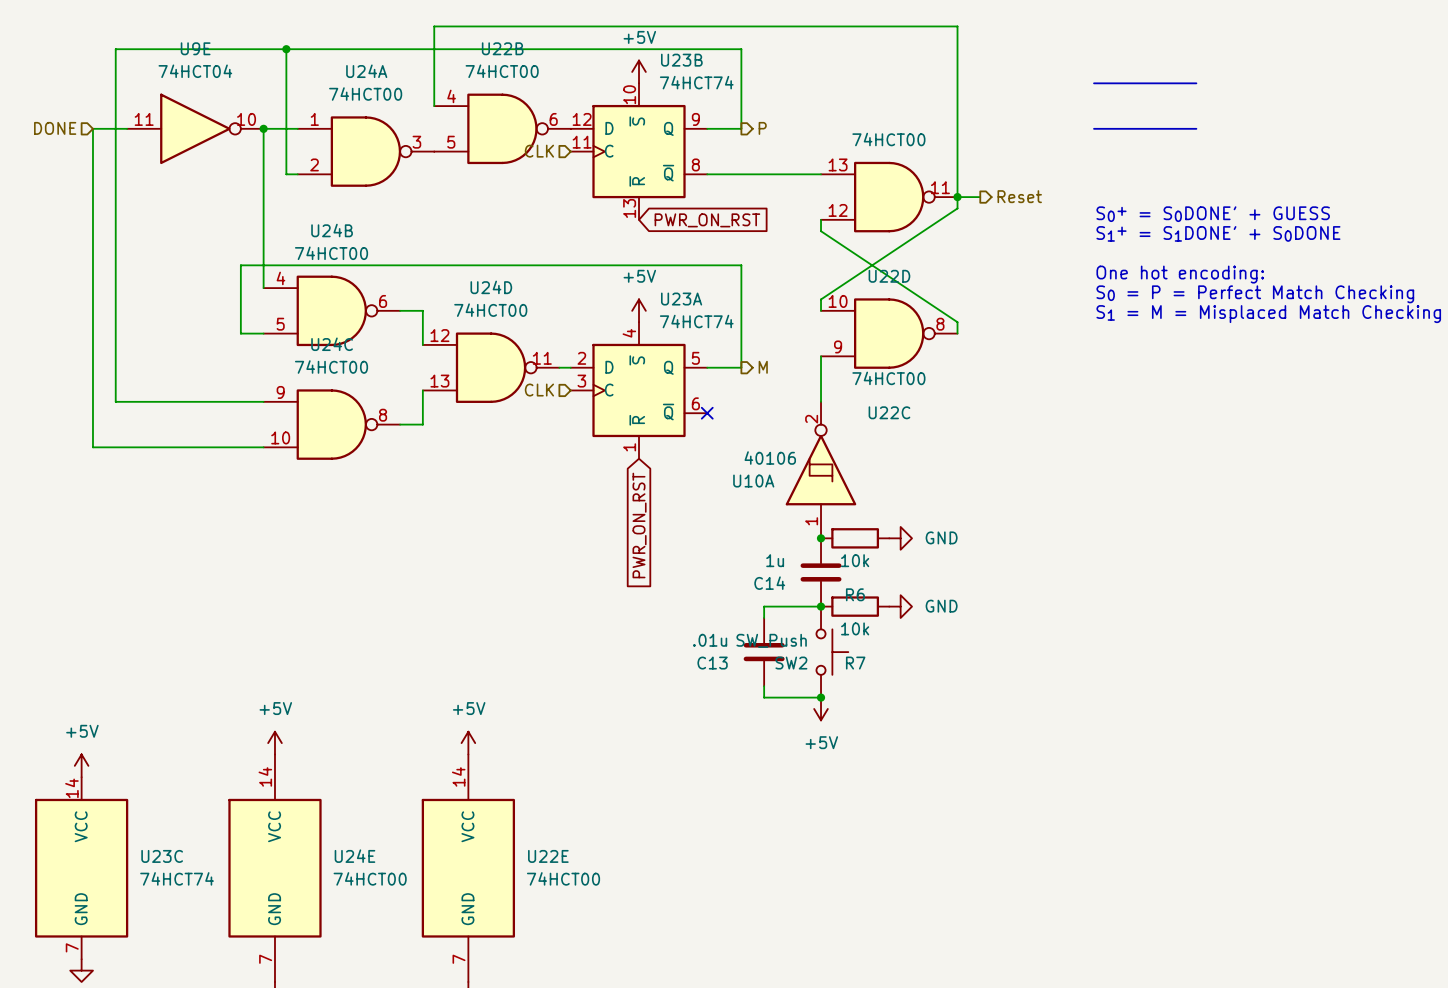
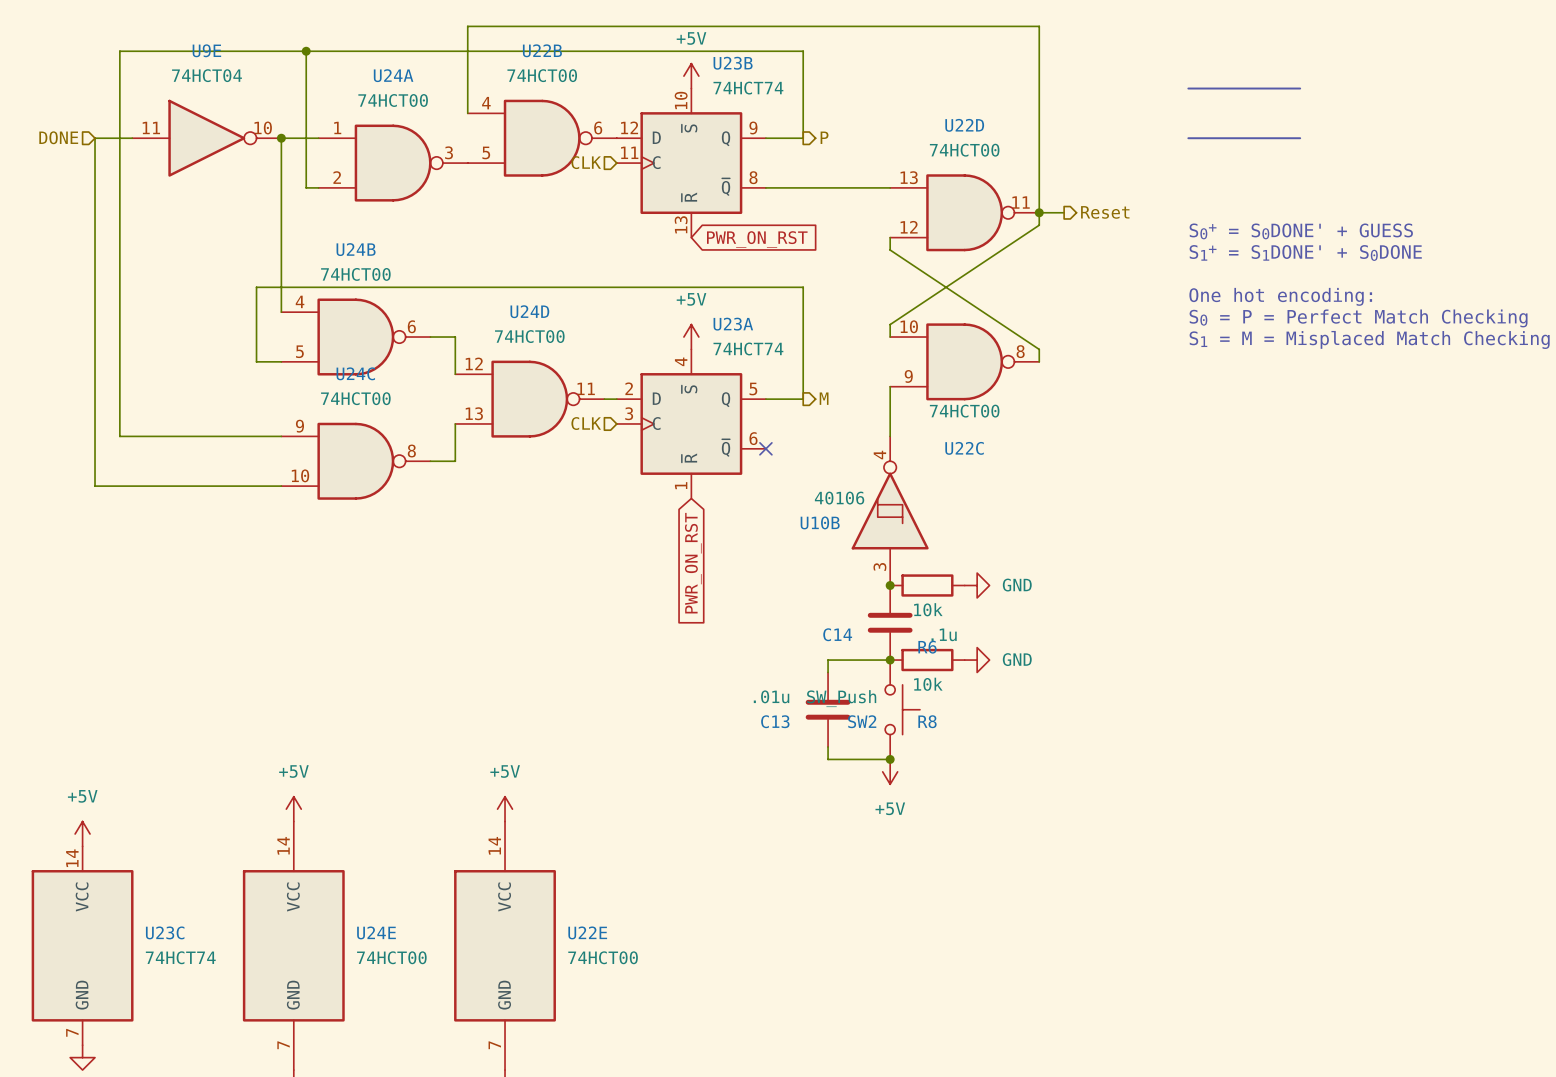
U22D name position: U22D (889, 276) -> U22D (964, 125)
U10A pin number: 2 (811, 419) -> 4 (879, 455)
U10A name: U10A (753, 481) -> U10B (820, 522)
U10A pin number: 1 (811, 521) -> 3 (879, 566)
C14 value: 1u (775, 560) -> .1u (944, 634)
R7 name: R7 (855, 663) -> R8 (927, 721)

